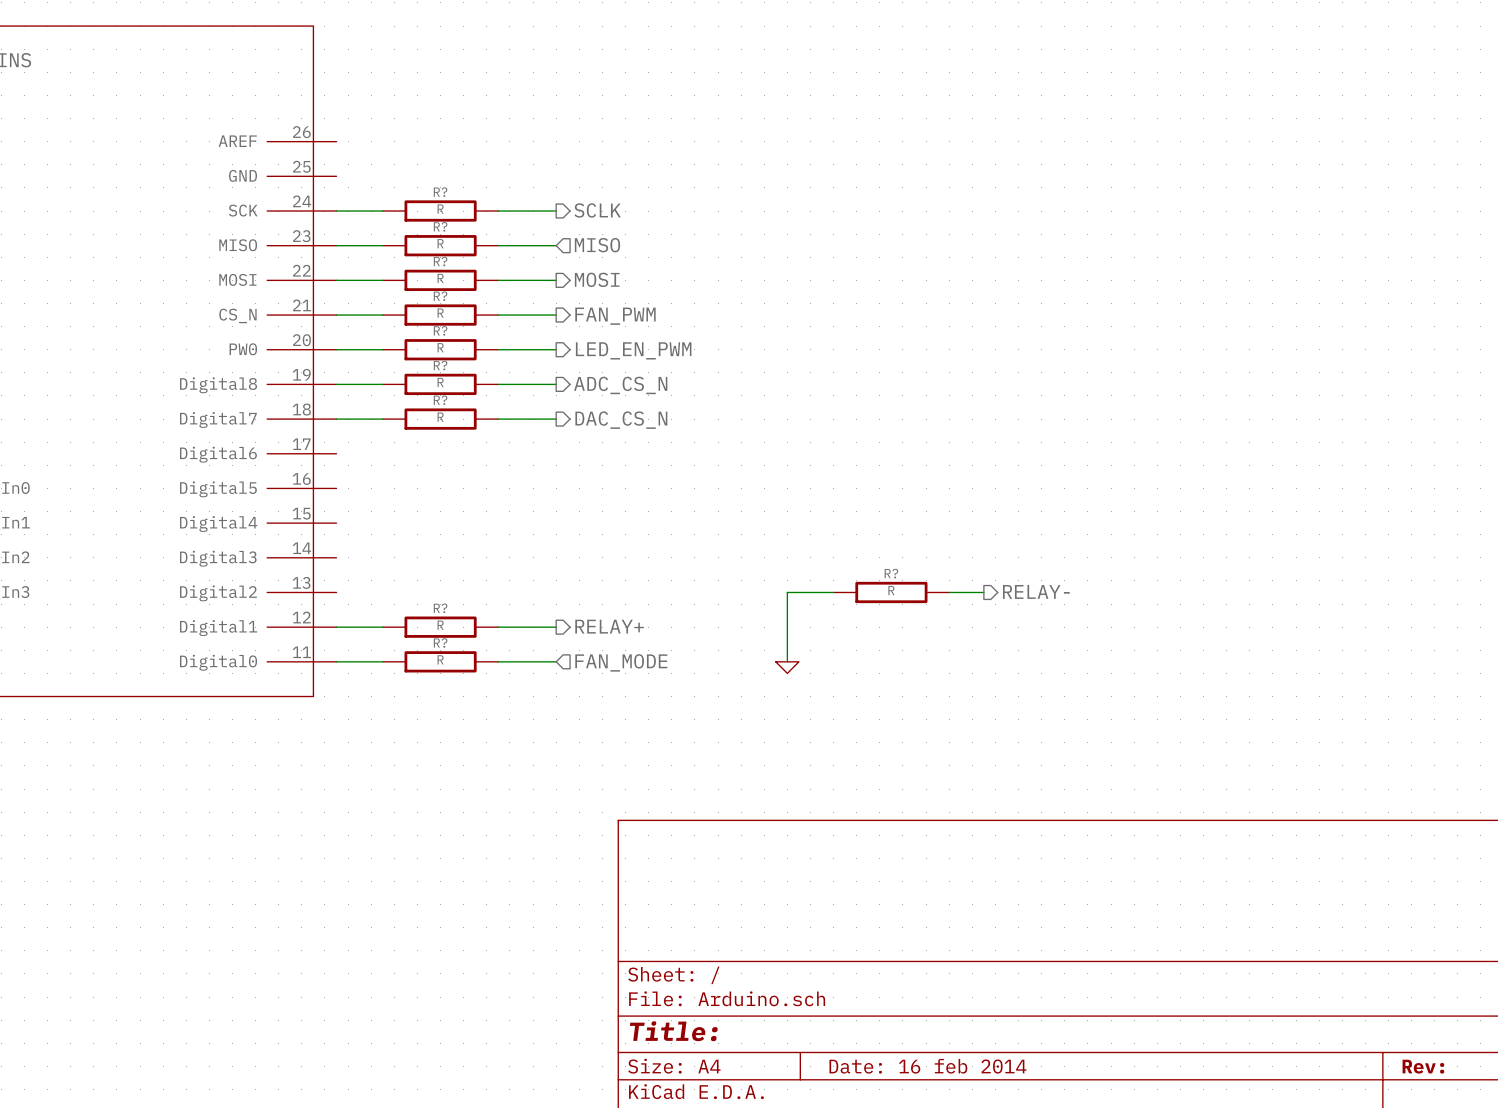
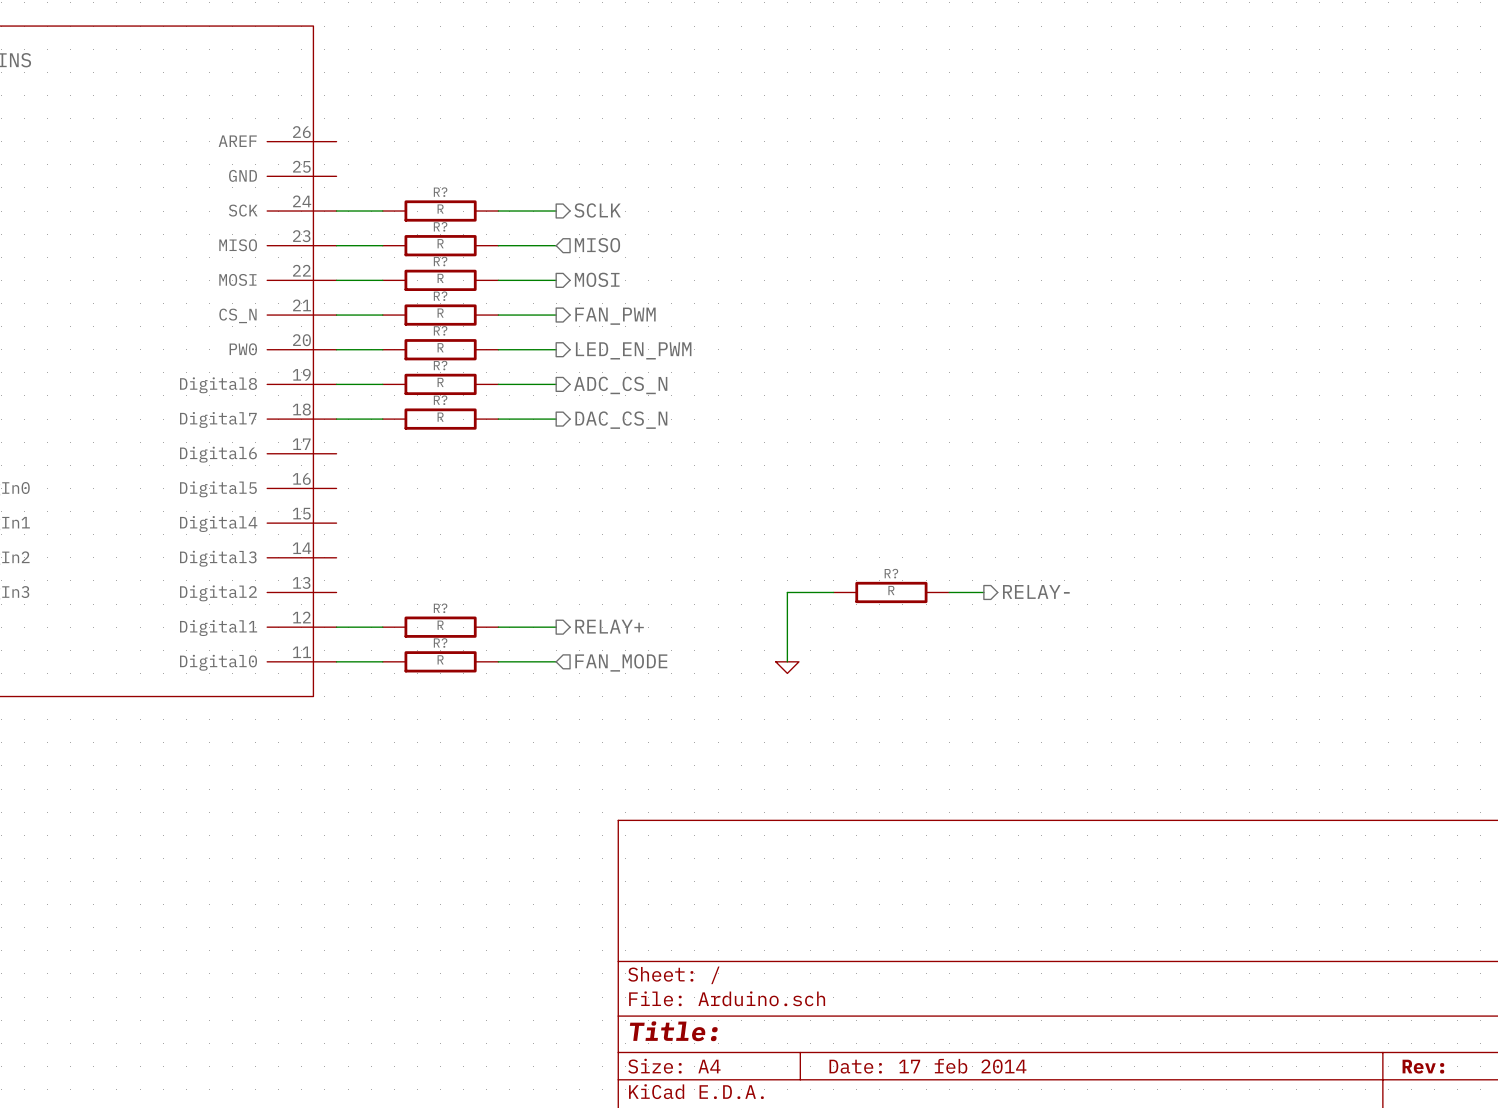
title block: Date: 16 feb 2014 (927, 1066) -> Date: 17 feb 2014 (927, 1066)

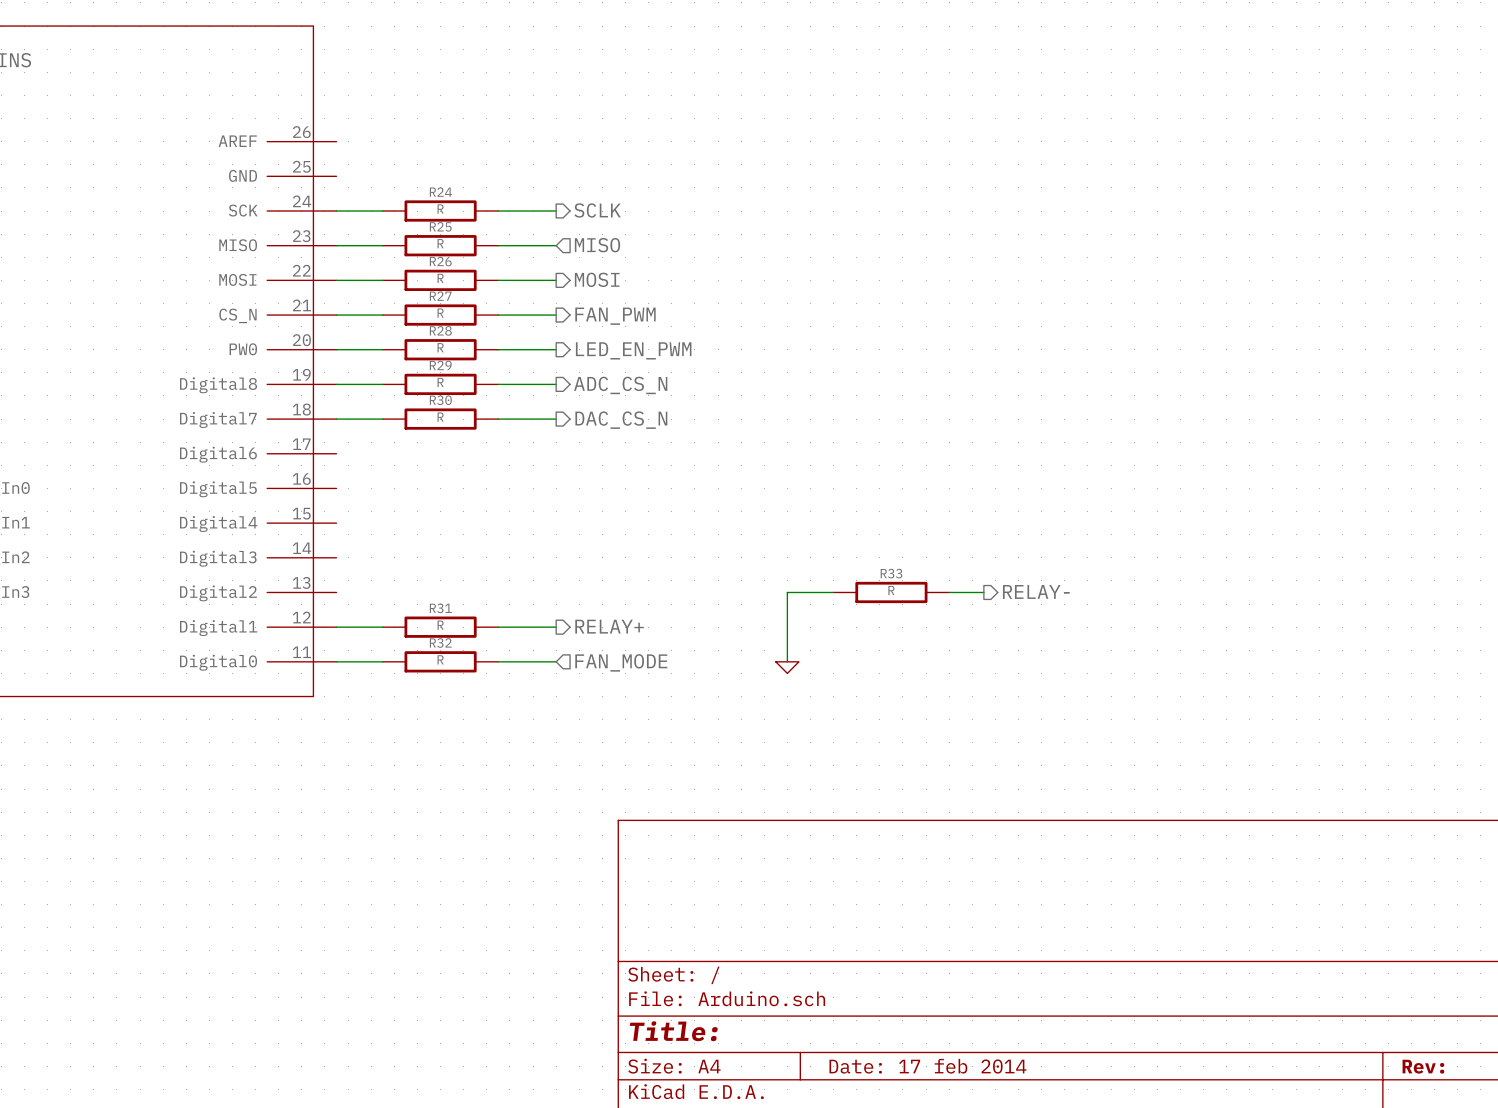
R? name: R? (440, 192) -> R24 (440, 192)
R? name: R? (440, 226) -> R25 (440, 226)
R? name: R? (440, 261) -> R26 (440, 261)
R? name: R? (440, 296) -> R27 (440, 296)
R? name: R? (440, 330) -> R28 (440, 330)
R? name: R? (440, 365) -> R29 (440, 365)
R? name: R? (440, 400) -> R30 (440, 400)
R? name: R? (891, 573) -> R33 (891, 573)
R? name: R? (440, 608) -> R31 (440, 608)
R? name: R? (440, 642) -> R32 (440, 643)

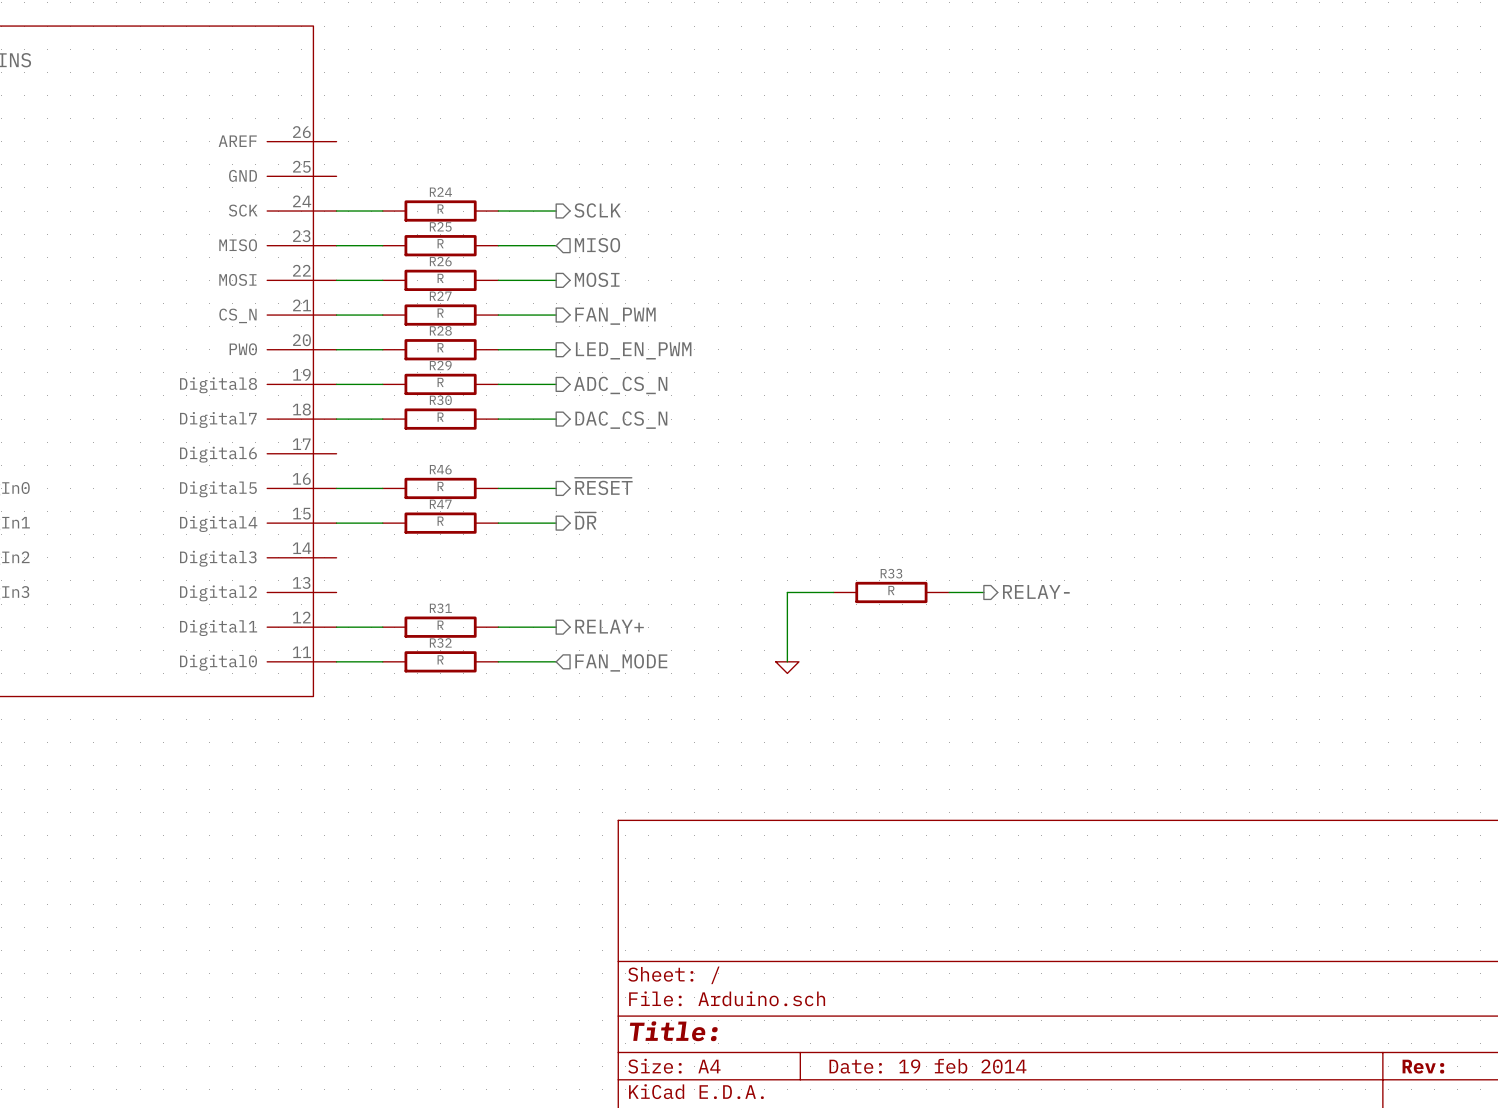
hierarchical label: none -> ~{RESET} (603, 486)
wire: none -> (336, 488) (382, 488)
R46: none -> R (440, 488)
wire: none -> (498, 488) (556, 488)
hierarchical label: none -> ~{DR} (585, 521)
wire: none -> (336, 523) (382, 523)
R47: none -> R (440, 523)
wire: none -> (498, 523) (556, 523)
title block: Date: 17 feb 2014 (927, 1066) -> Date: 19 feb 2014 (927, 1066)

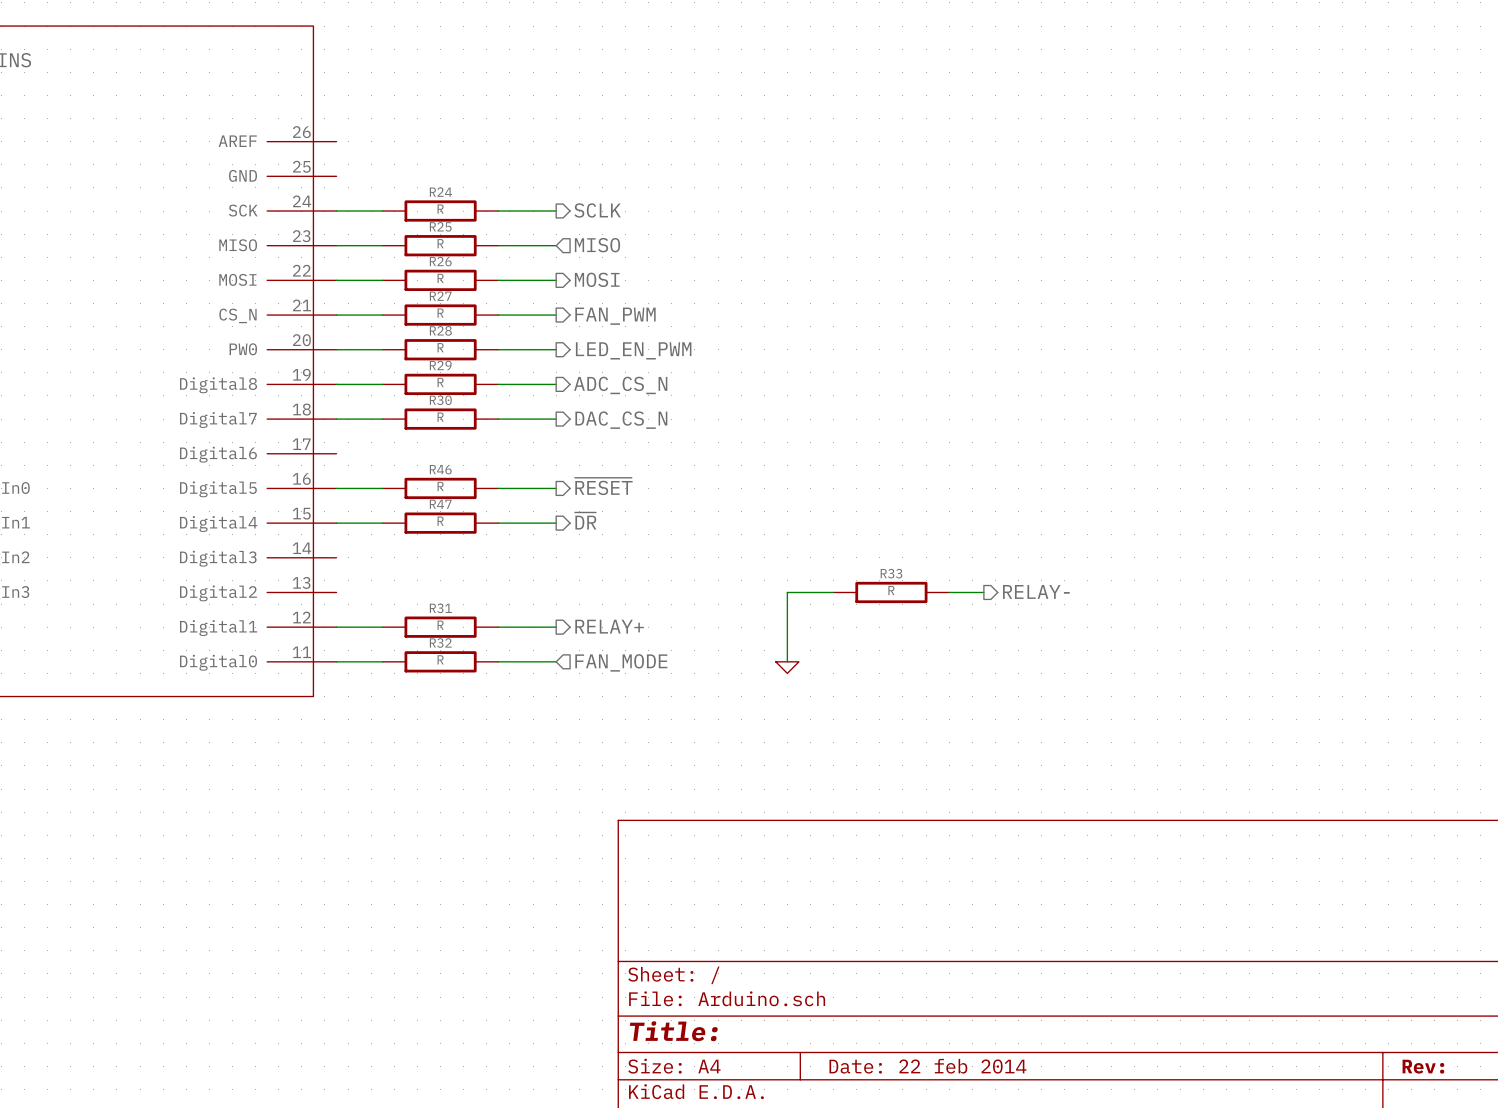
title block: Date: 19 feb 2014 (927, 1066) -> Date: 22 feb 2014 (927, 1066)

